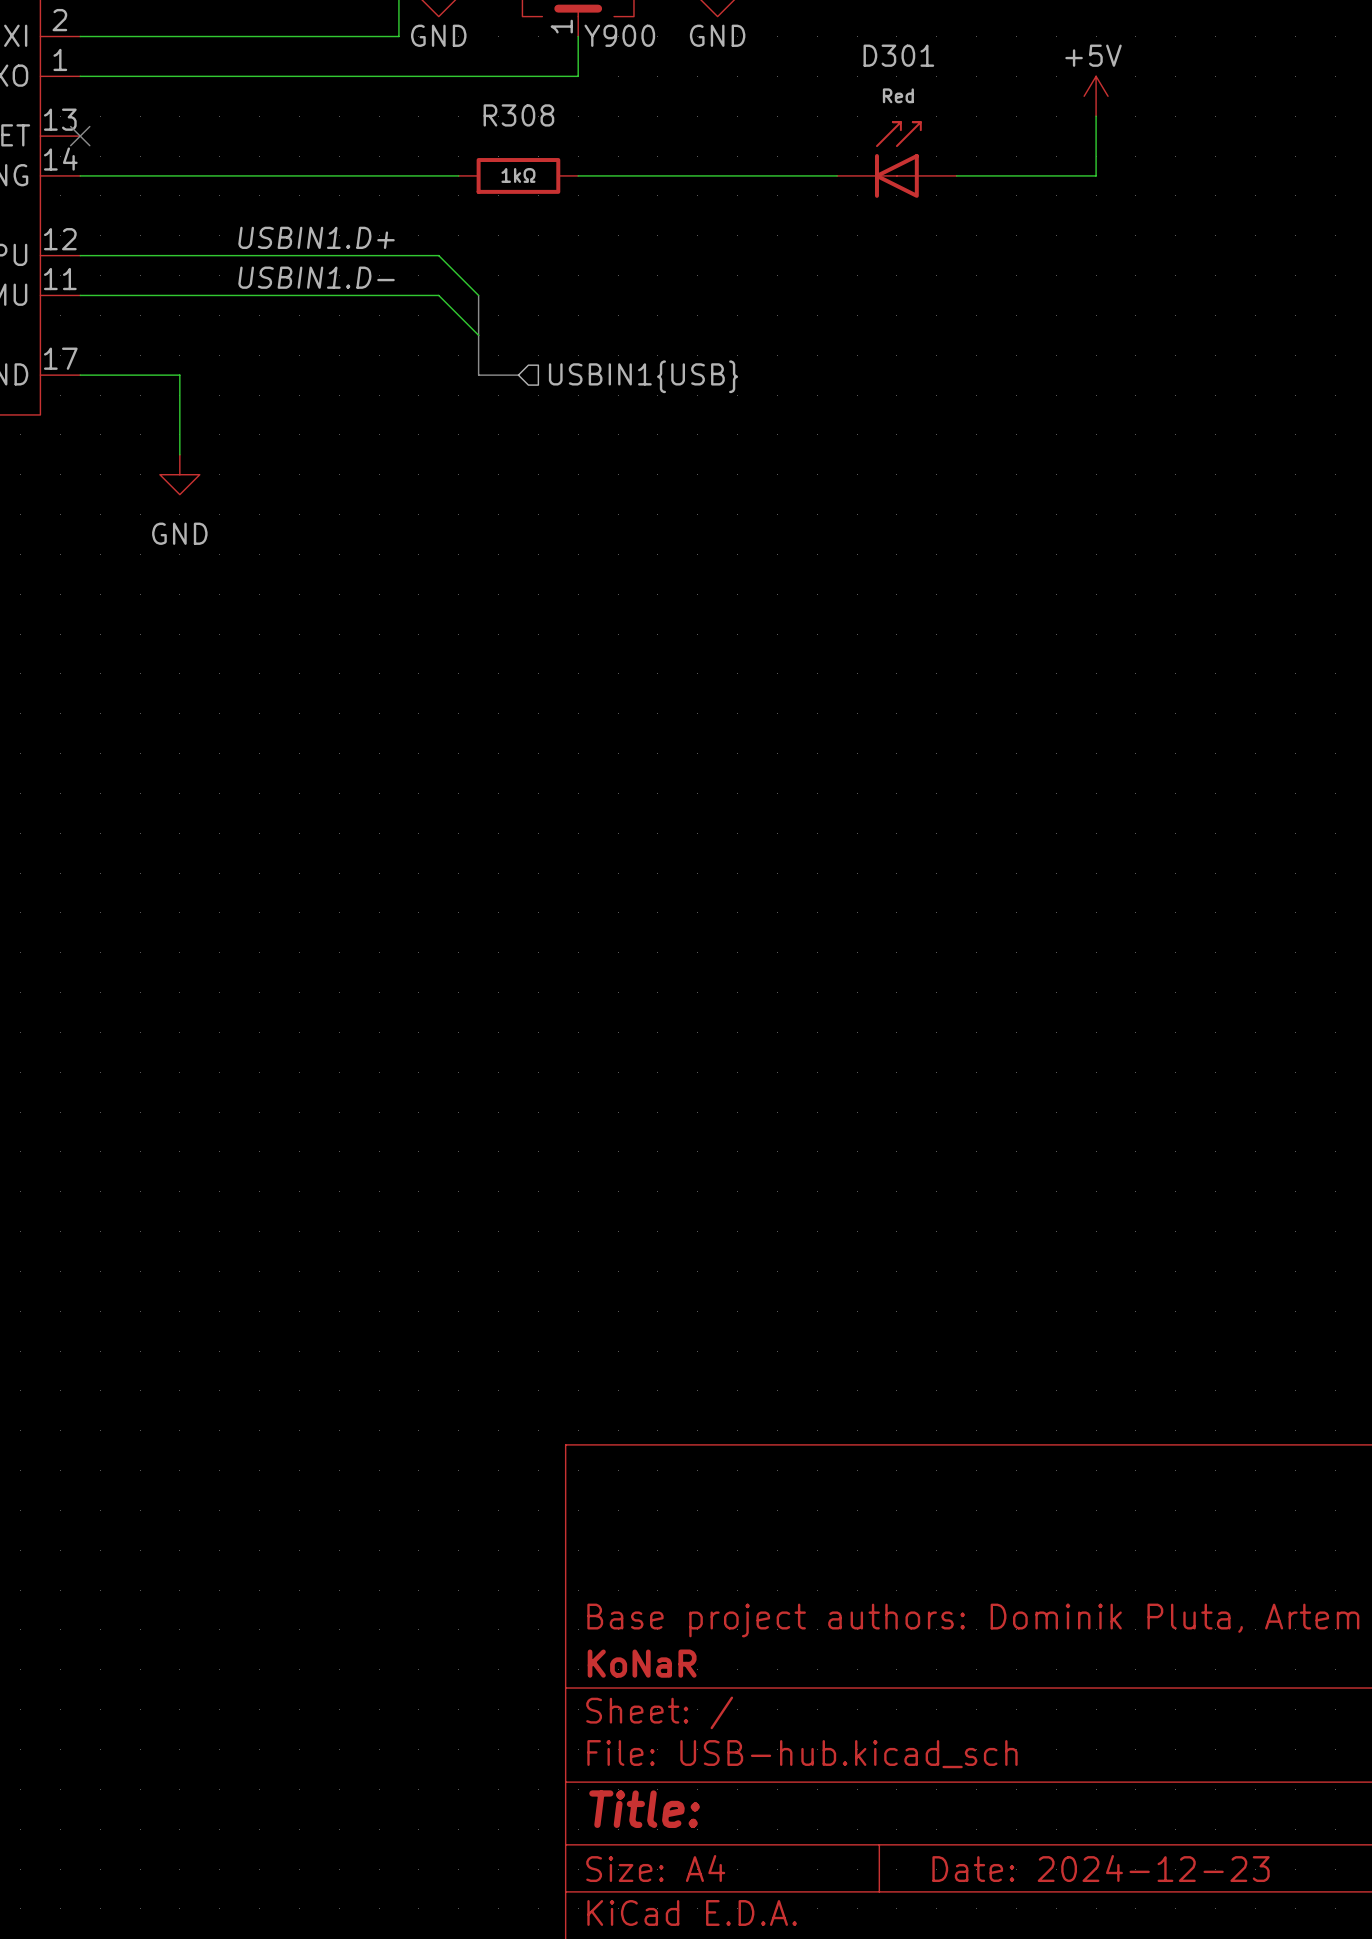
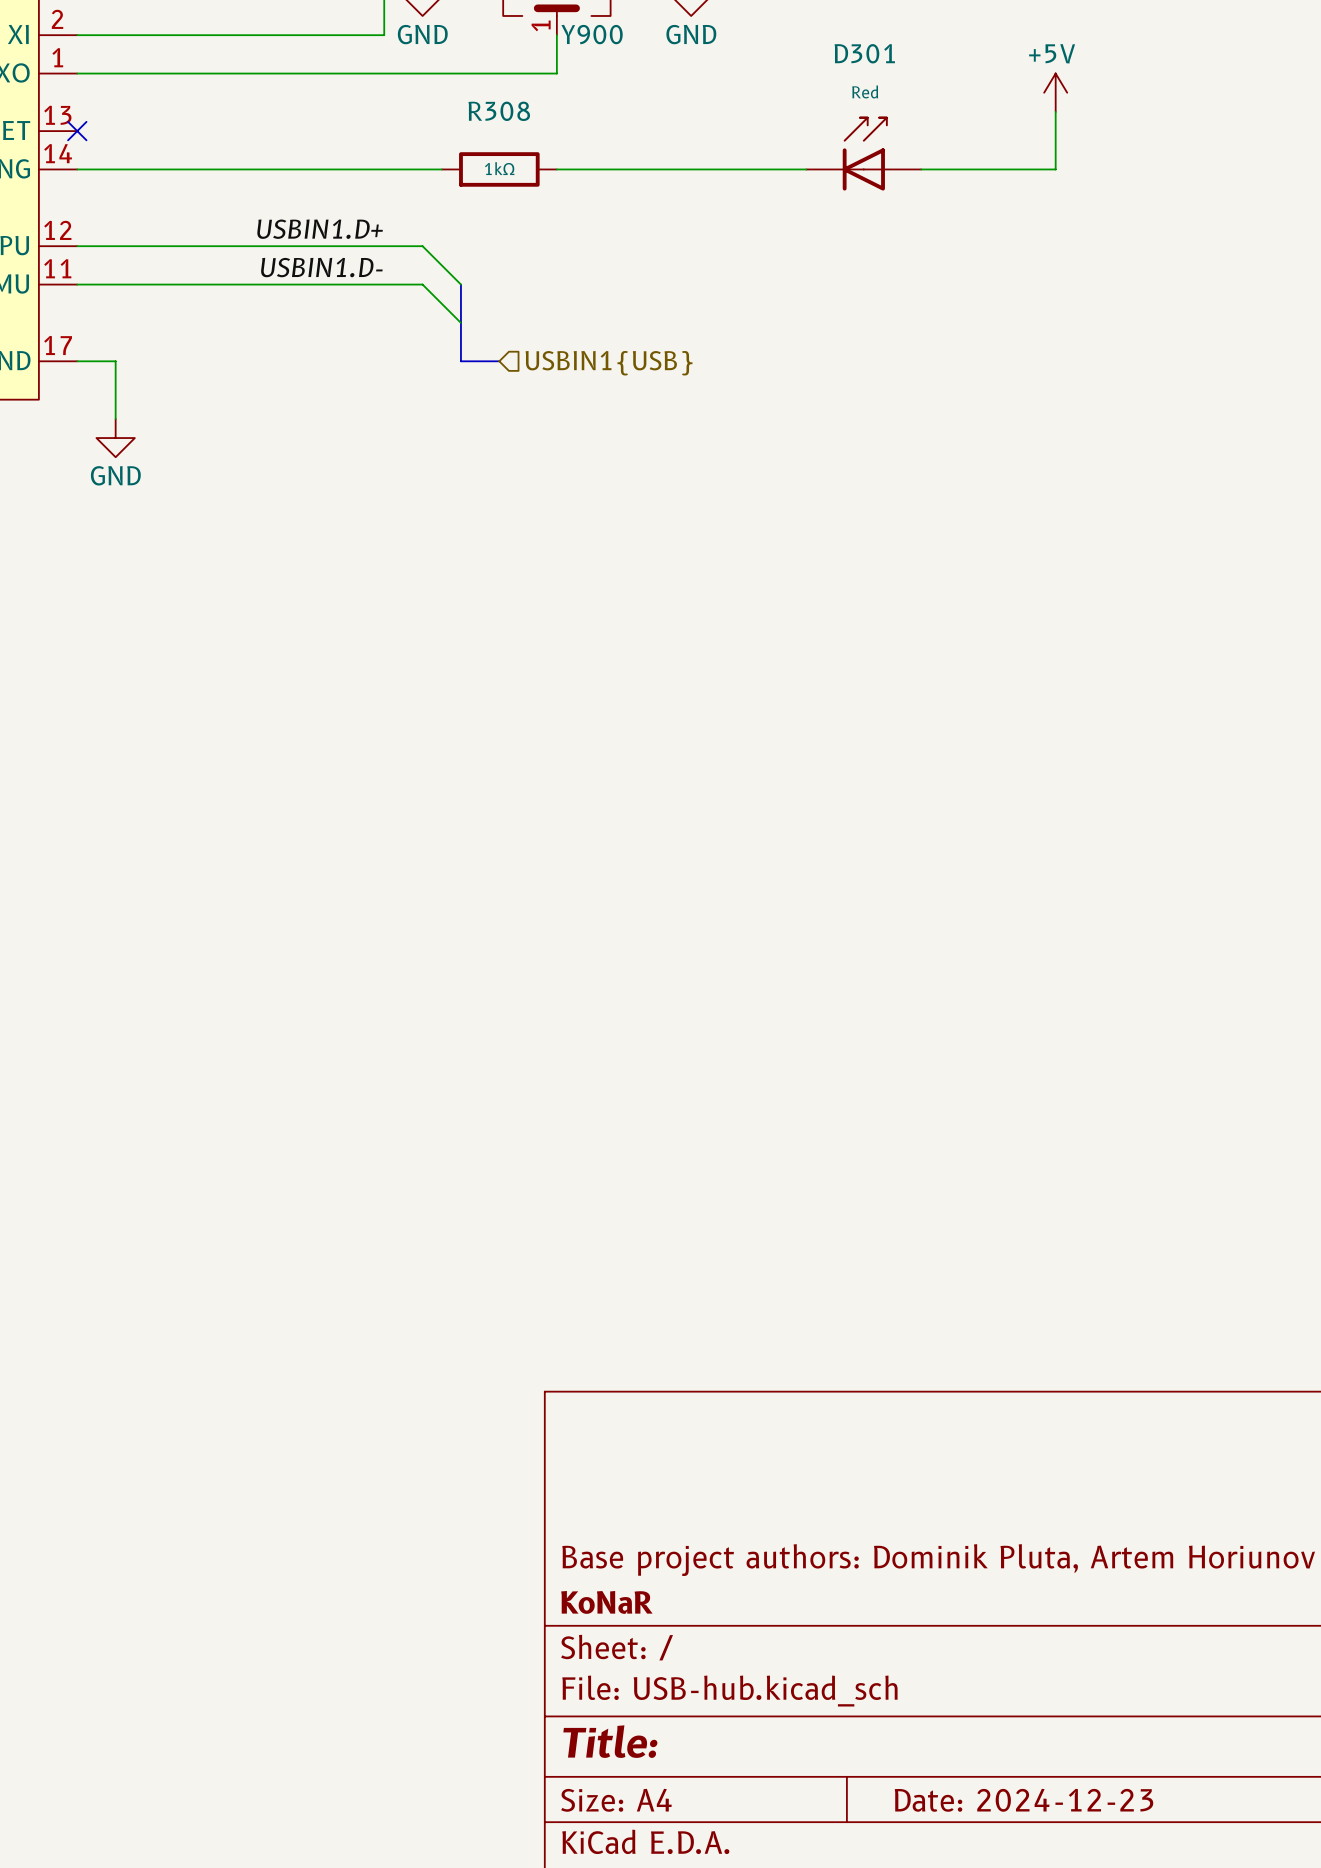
wire: (120, 375) (179, 375) (179, 454) -> (115, 361) (115, 418)
power symbol position: GND (179, 474) -> GND (115, 438)
power symbol text position: GND (179, 533) -> GND (115, 475)

